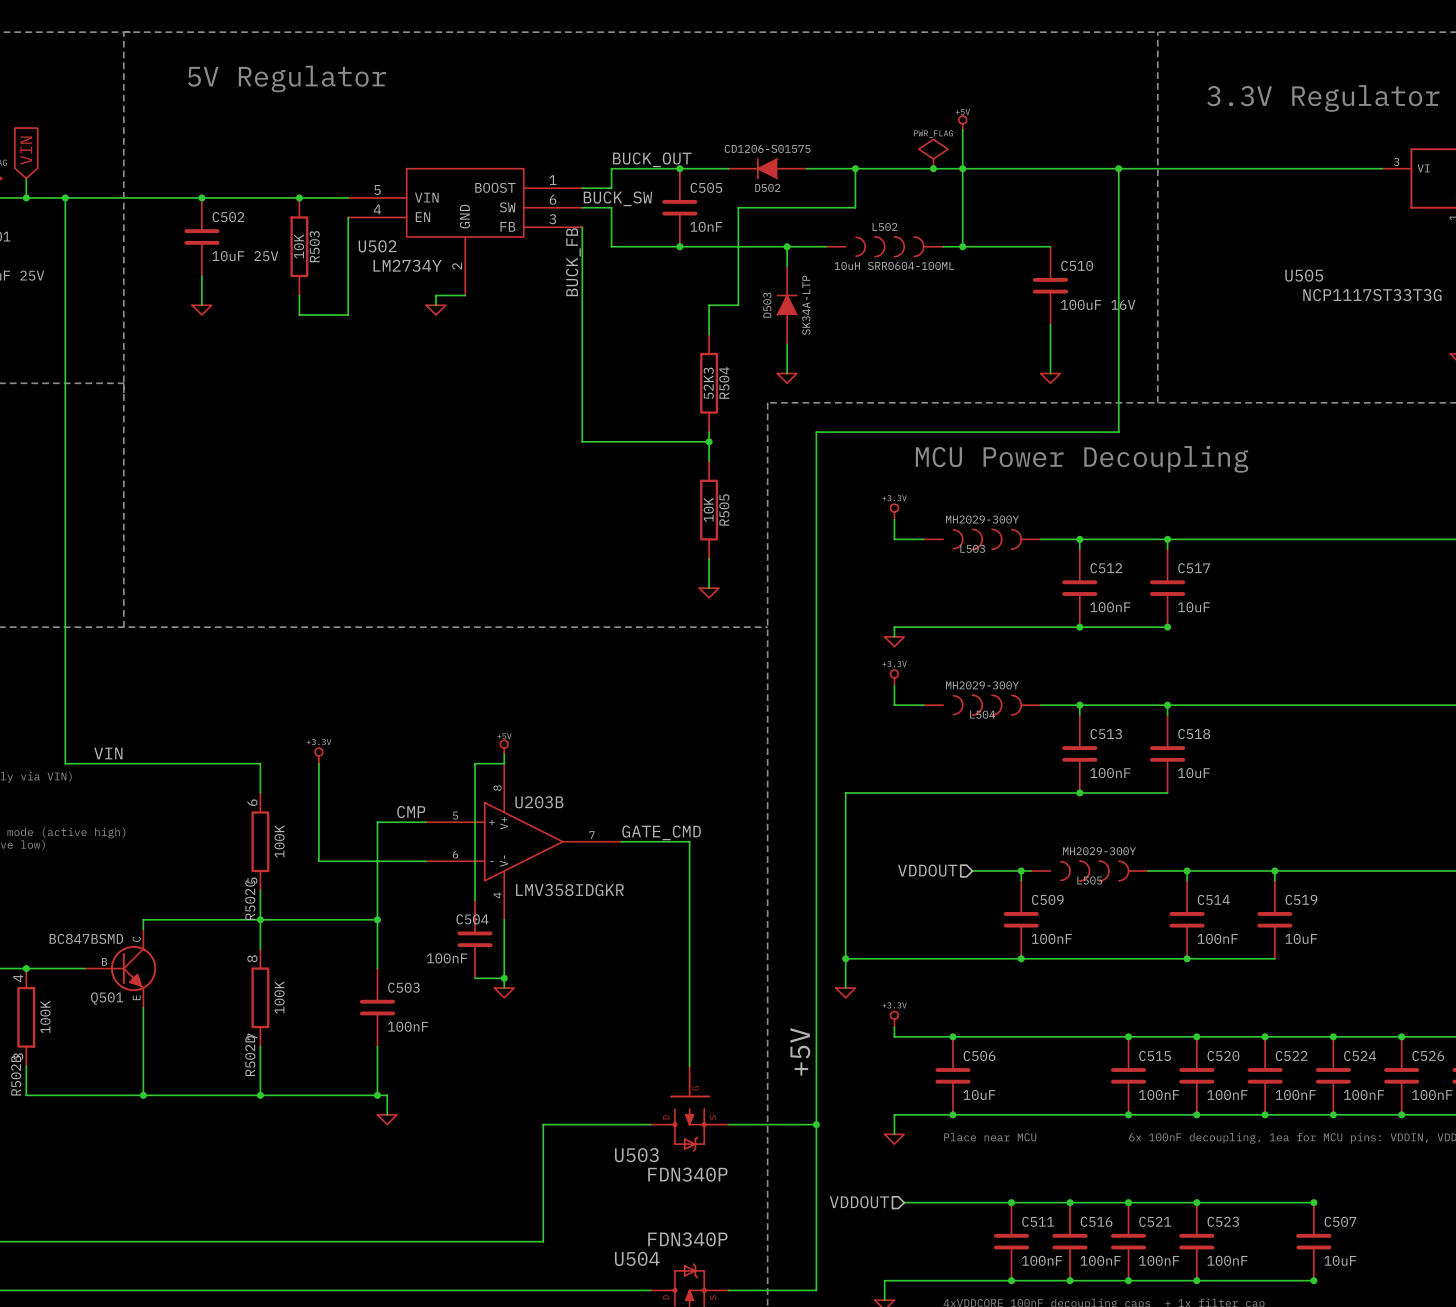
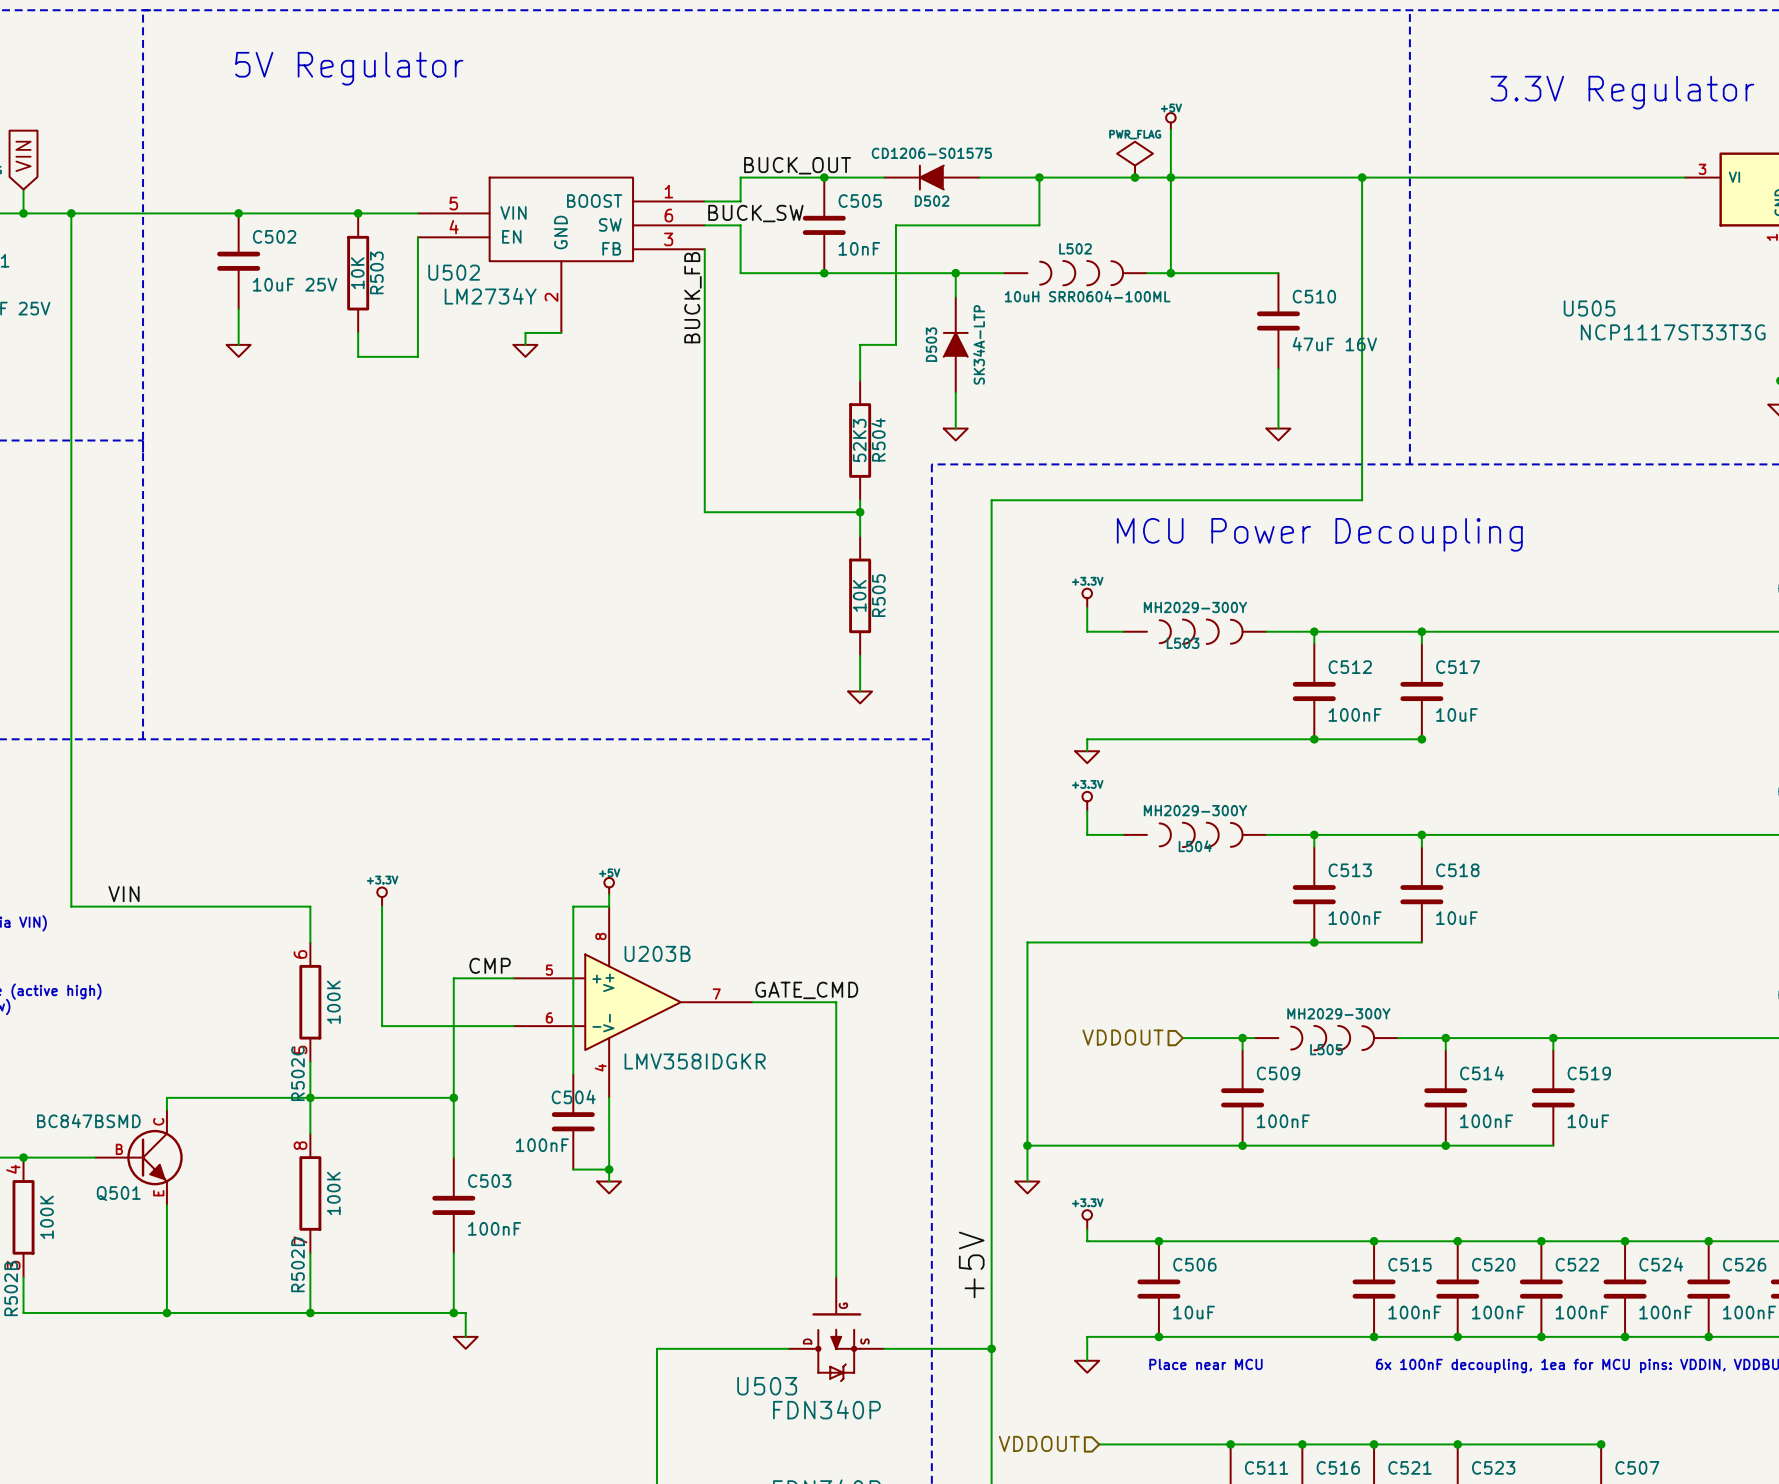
C510 value: 100uF 16V (1098, 304) -> 47uF 16V (1334, 344)

